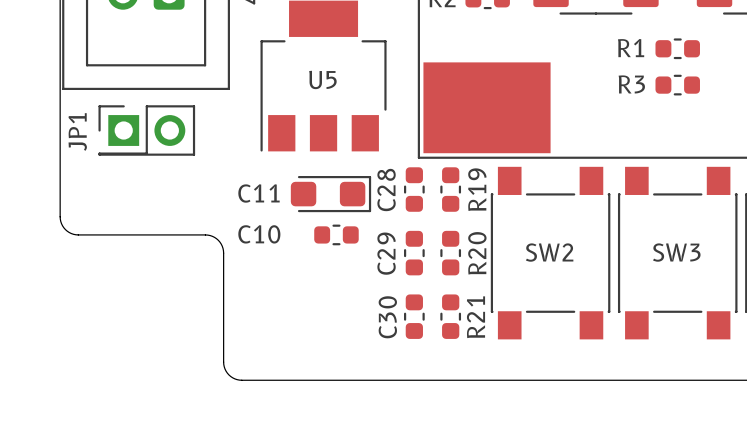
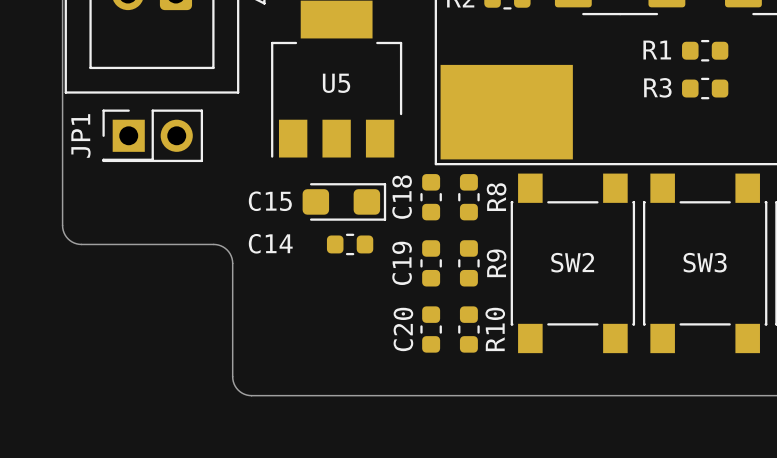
R19 name: R19 (477, 189) -> R8 (496, 197)
C28 name: C28 (386, 190) -> C18 (402, 197)
C11 name: C11 (258, 193) -> C15 (270, 201)
C10 name: C10 (259, 234) -> C14 (270, 243)
C29 name: C29 (386, 253) -> C19 (402, 263)
R20 name: R20 (477, 253) -> R9 (496, 263)
C30 name: C30 (387, 317) -> C20 (403, 329)
R21 name: R21 (475, 317) -> R10 (495, 329)

